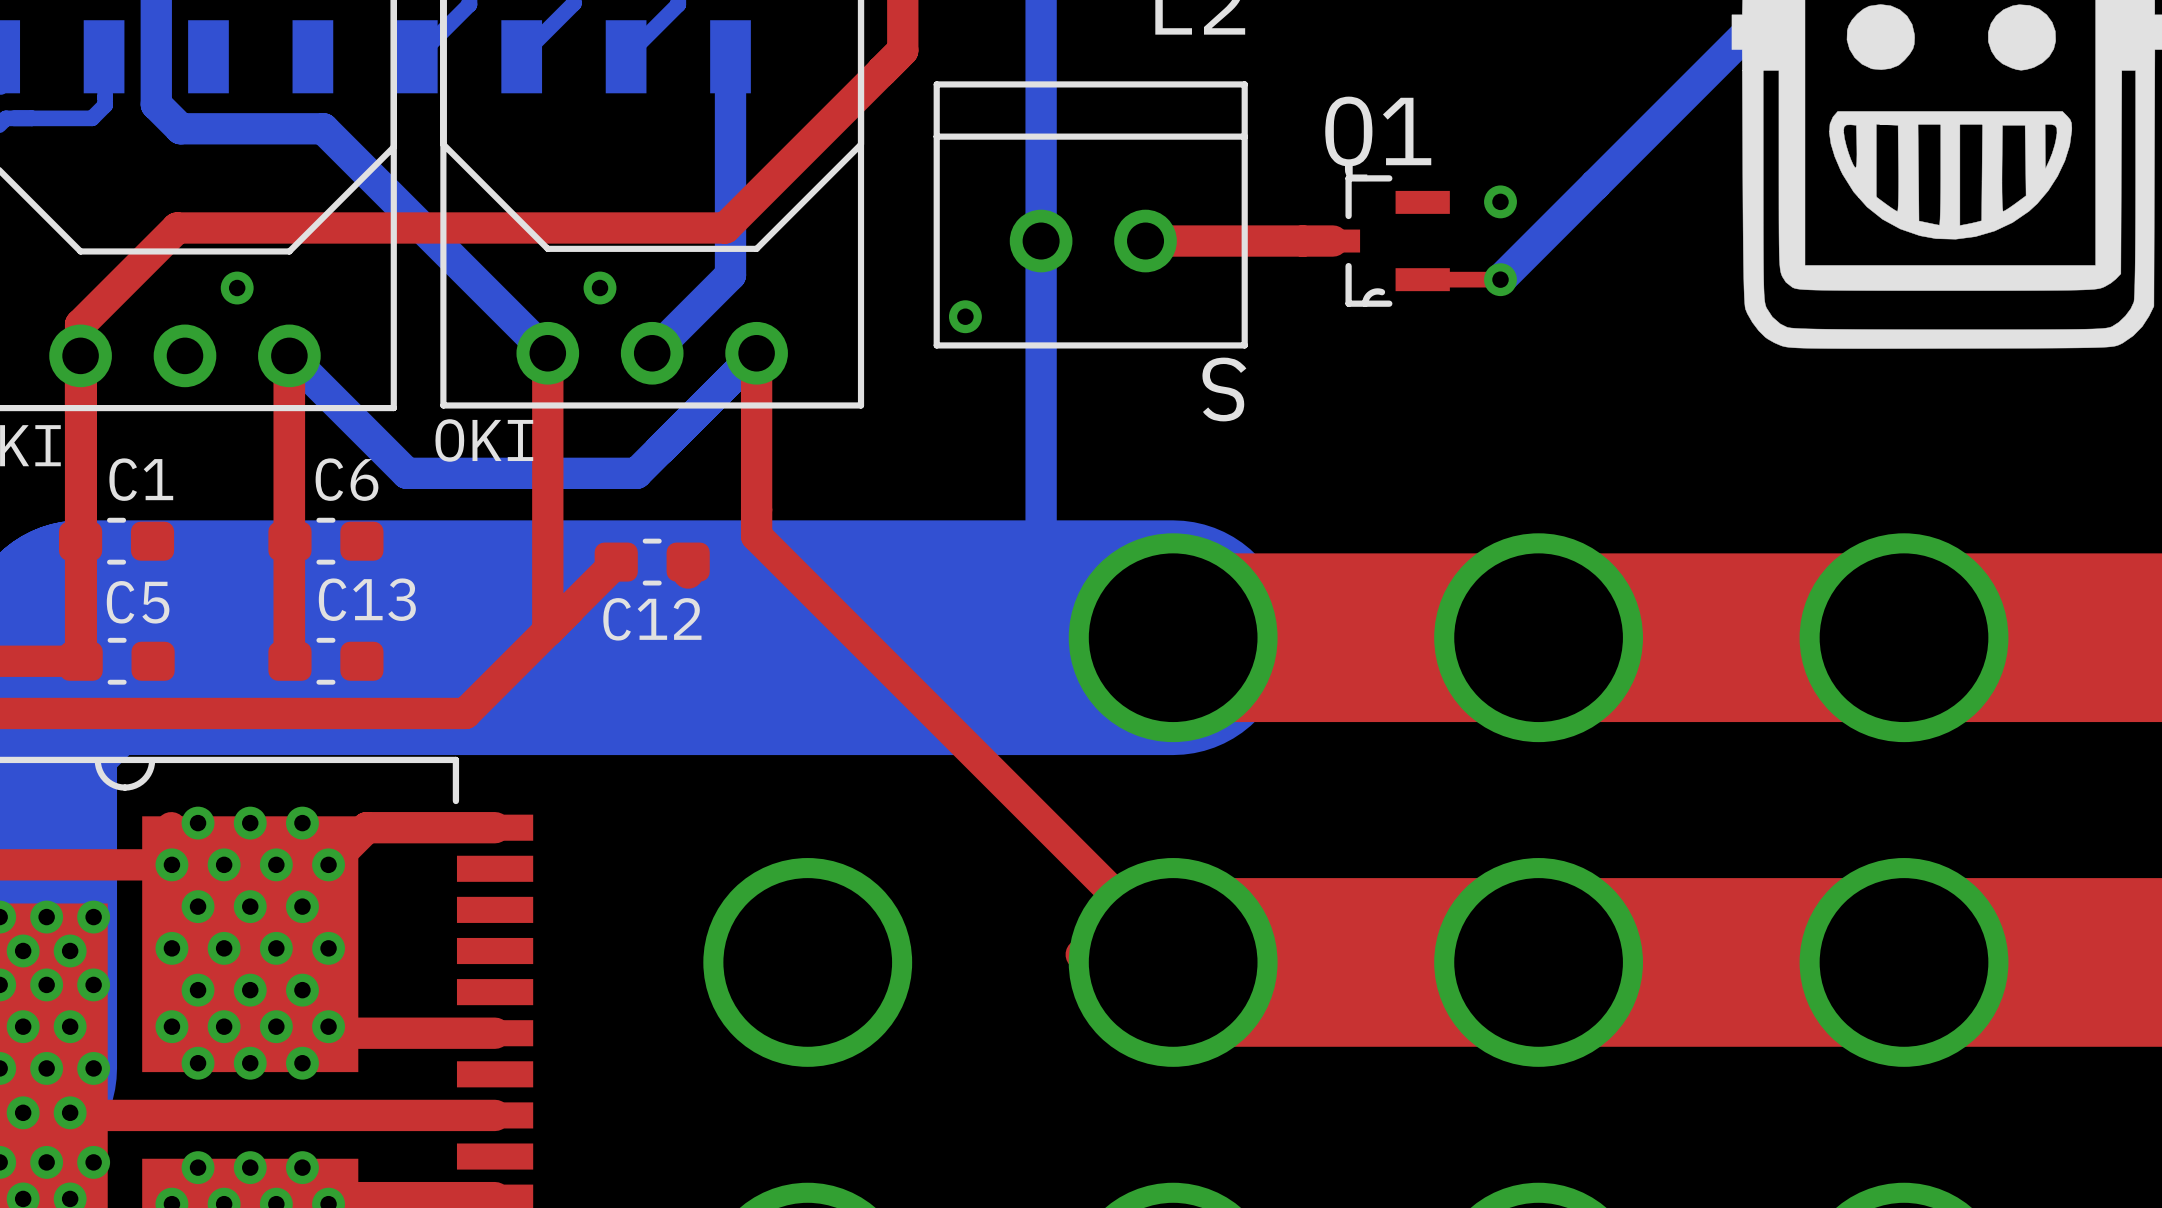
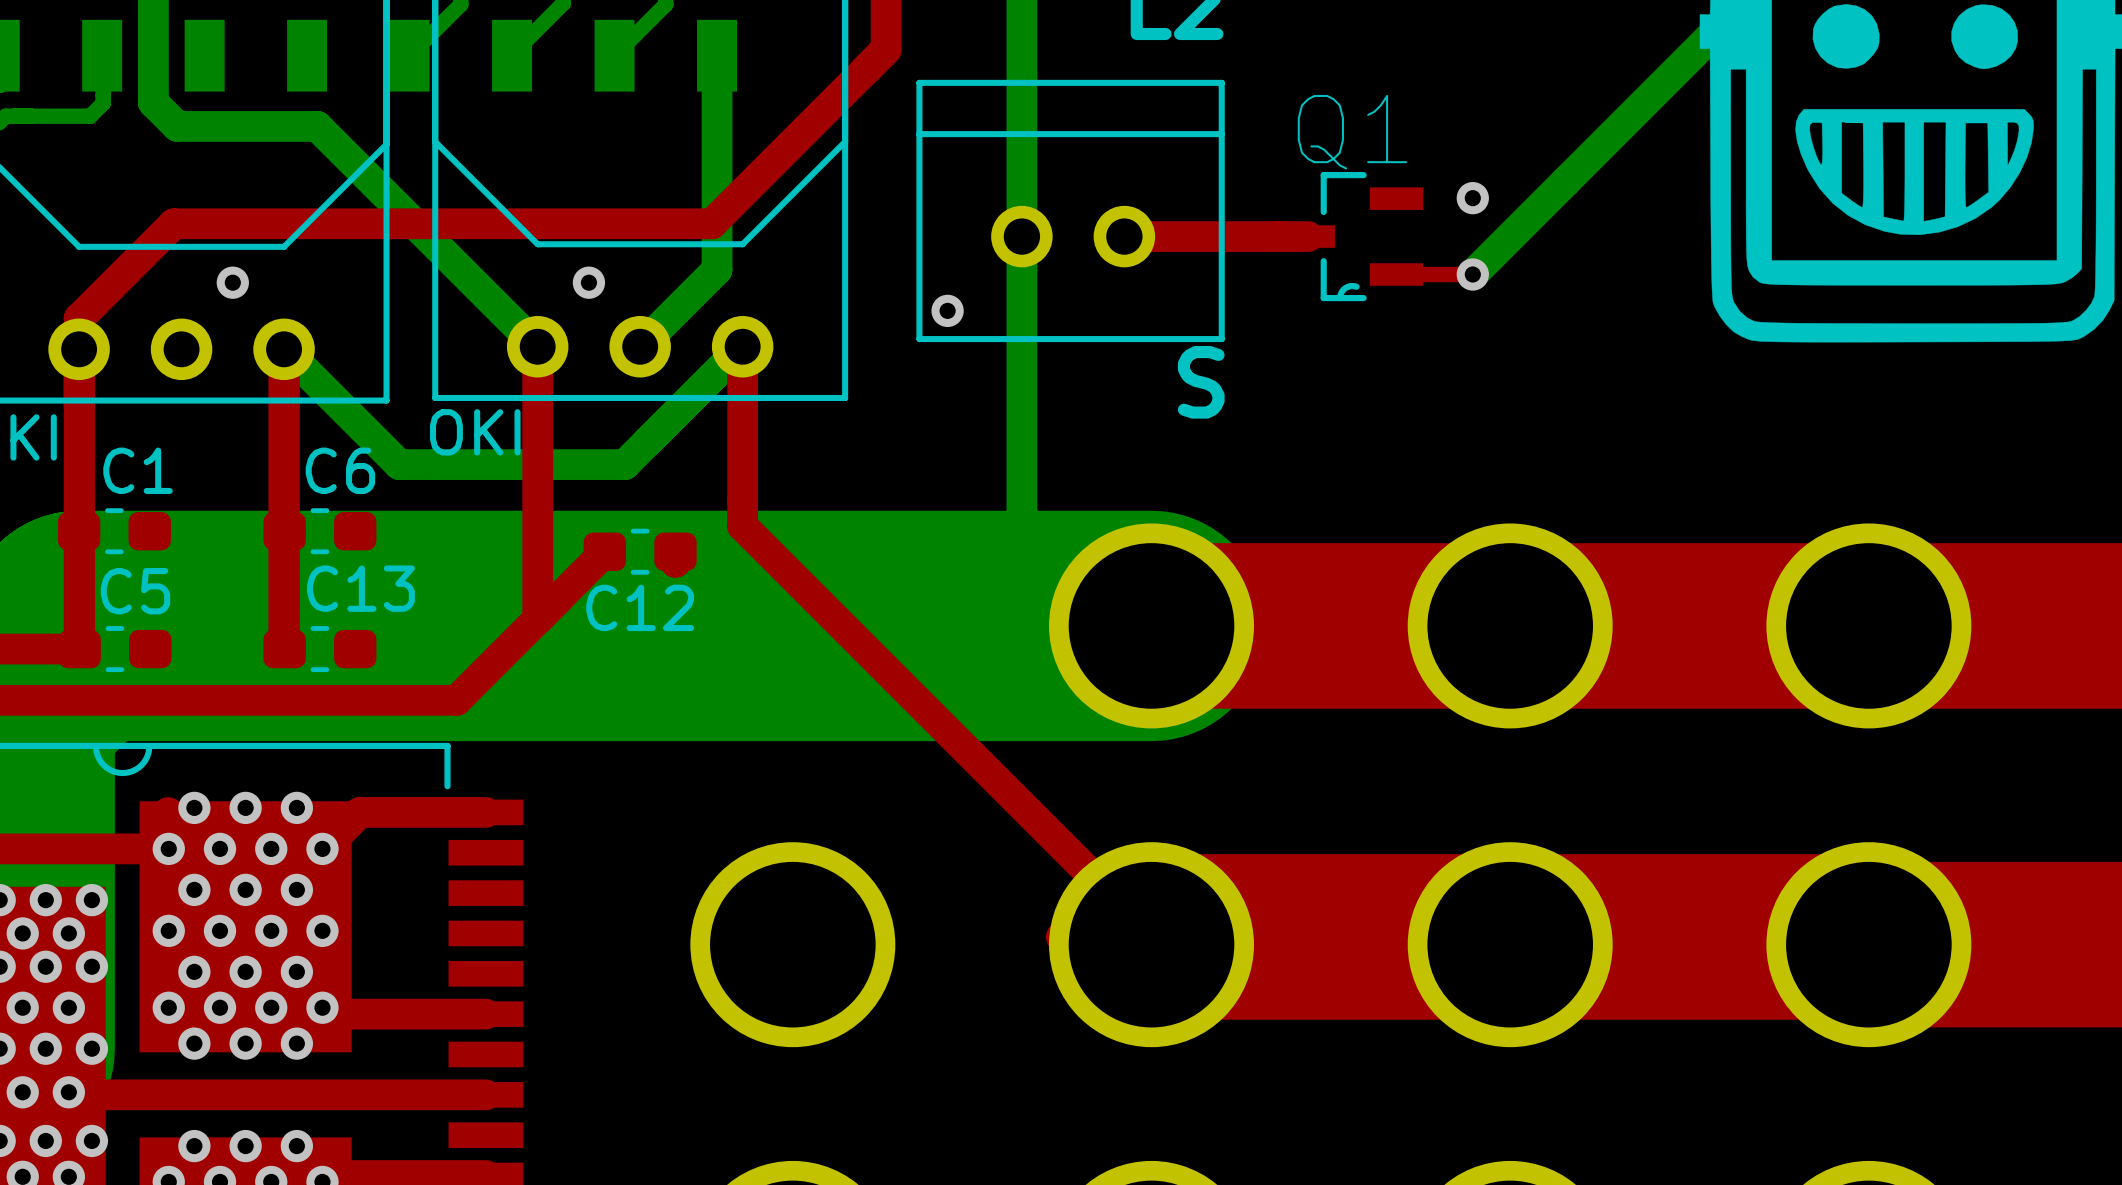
top track: none -> (1151, 936) (1861, 936)
top track: (1173, 962) (1904, 962) -> none

